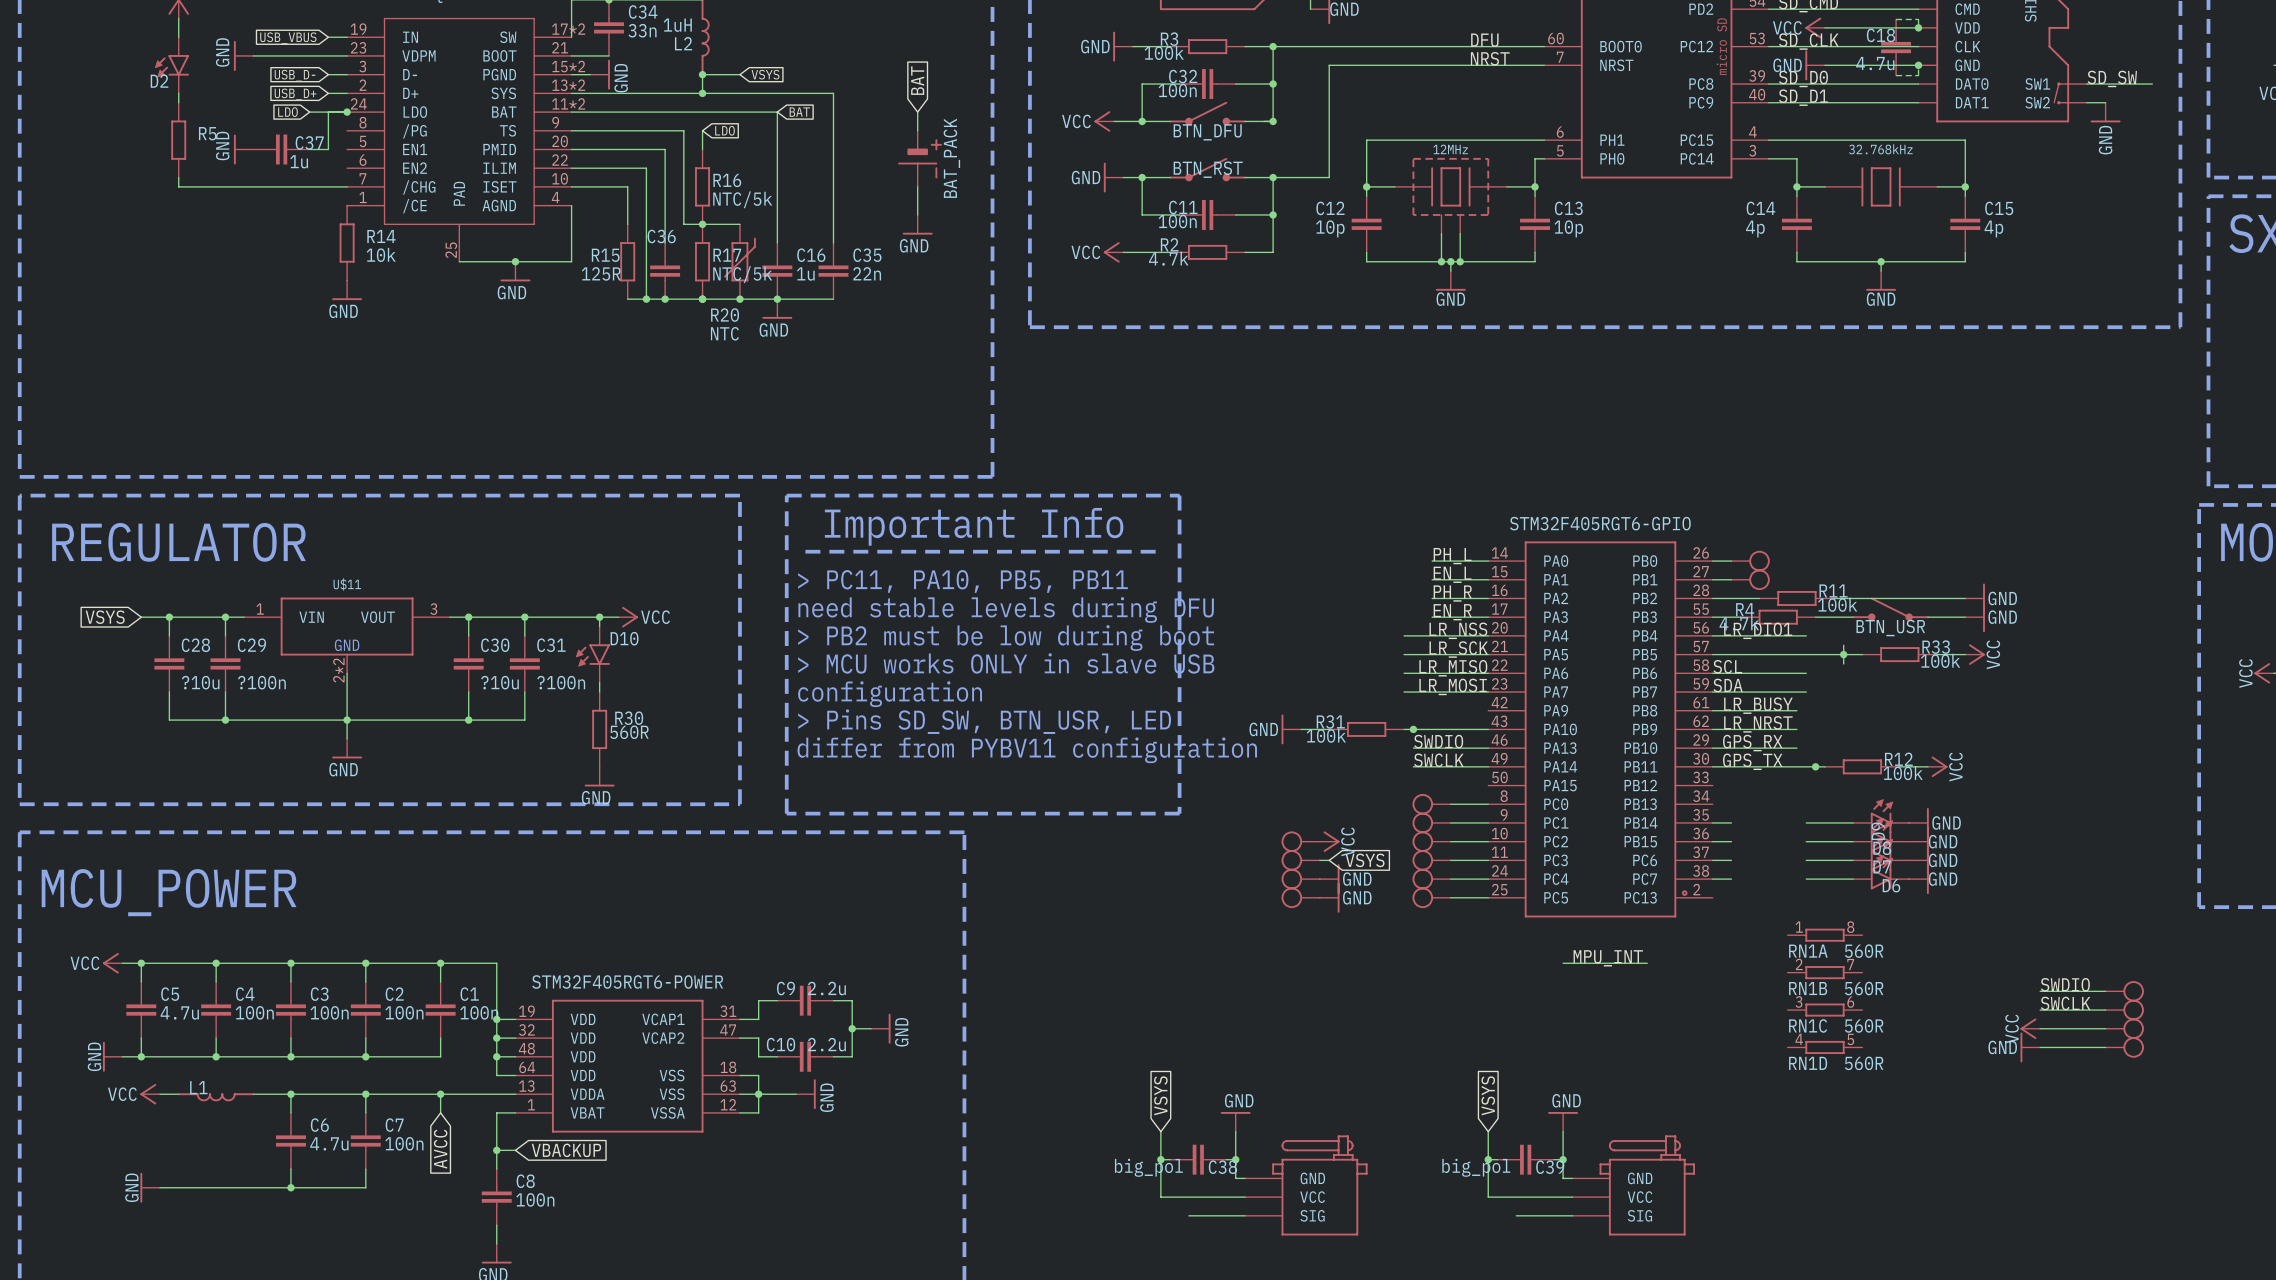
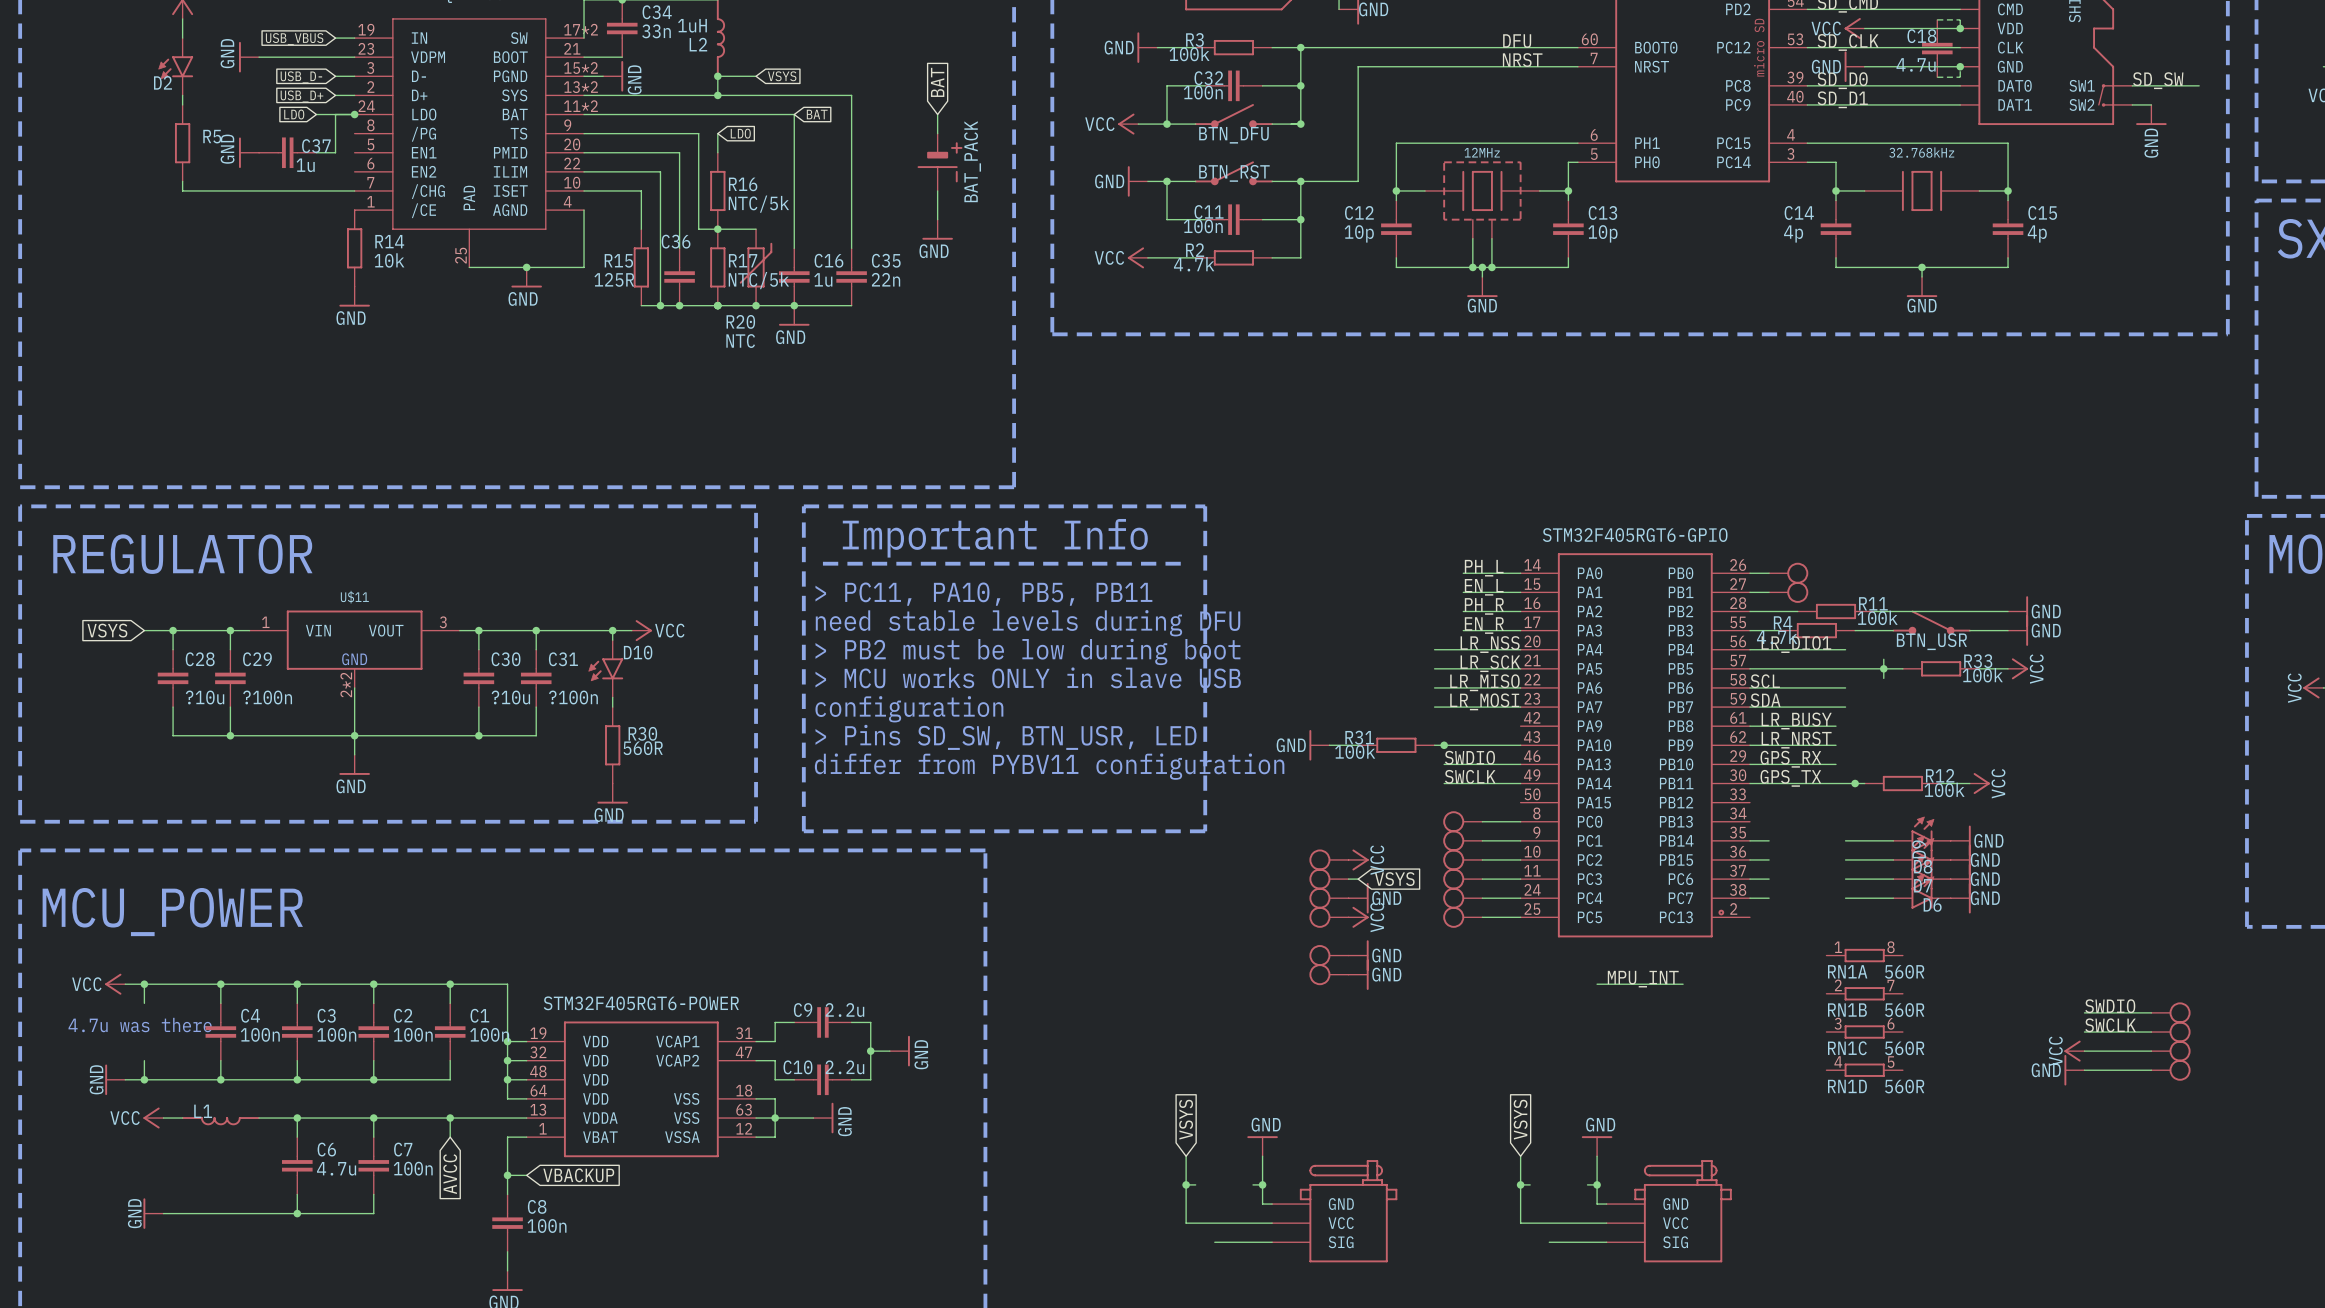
power symbol: GND (1329, 897) -> VCC (1358, 917)
part: none -> (1328, 955)
power symbol: none -> GND (1358, 955)
part: none -> (1328, 974)
power symbol: none -> GND (1358, 974)
text: none -> 4.7u was there (140, 1025)
C5: 4.7u (141, 1010) -> none
C38: big_pol (1198, 1159) -> none
C39: big_pol (1525, 1159) -> none

